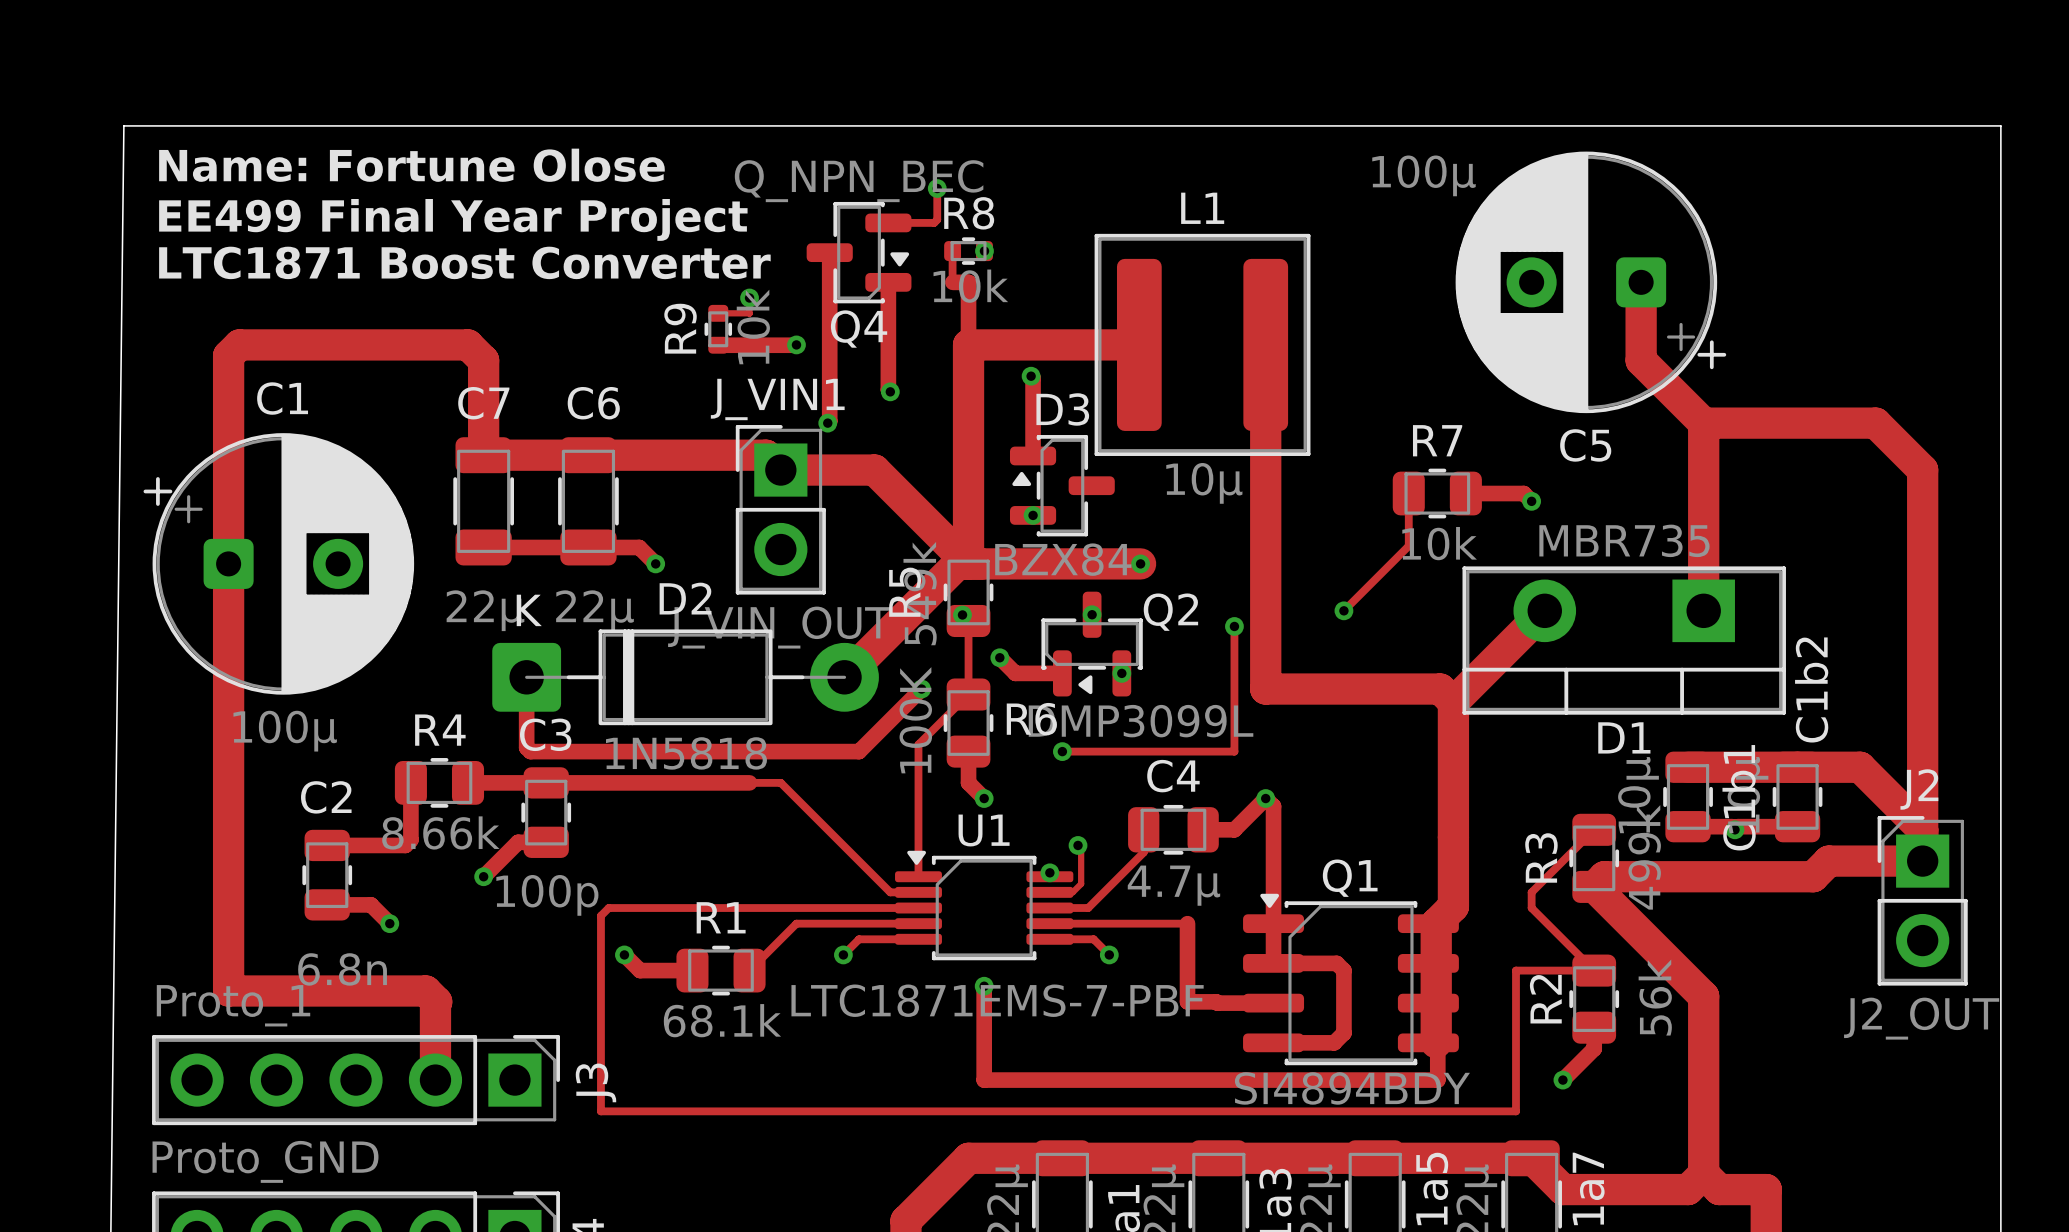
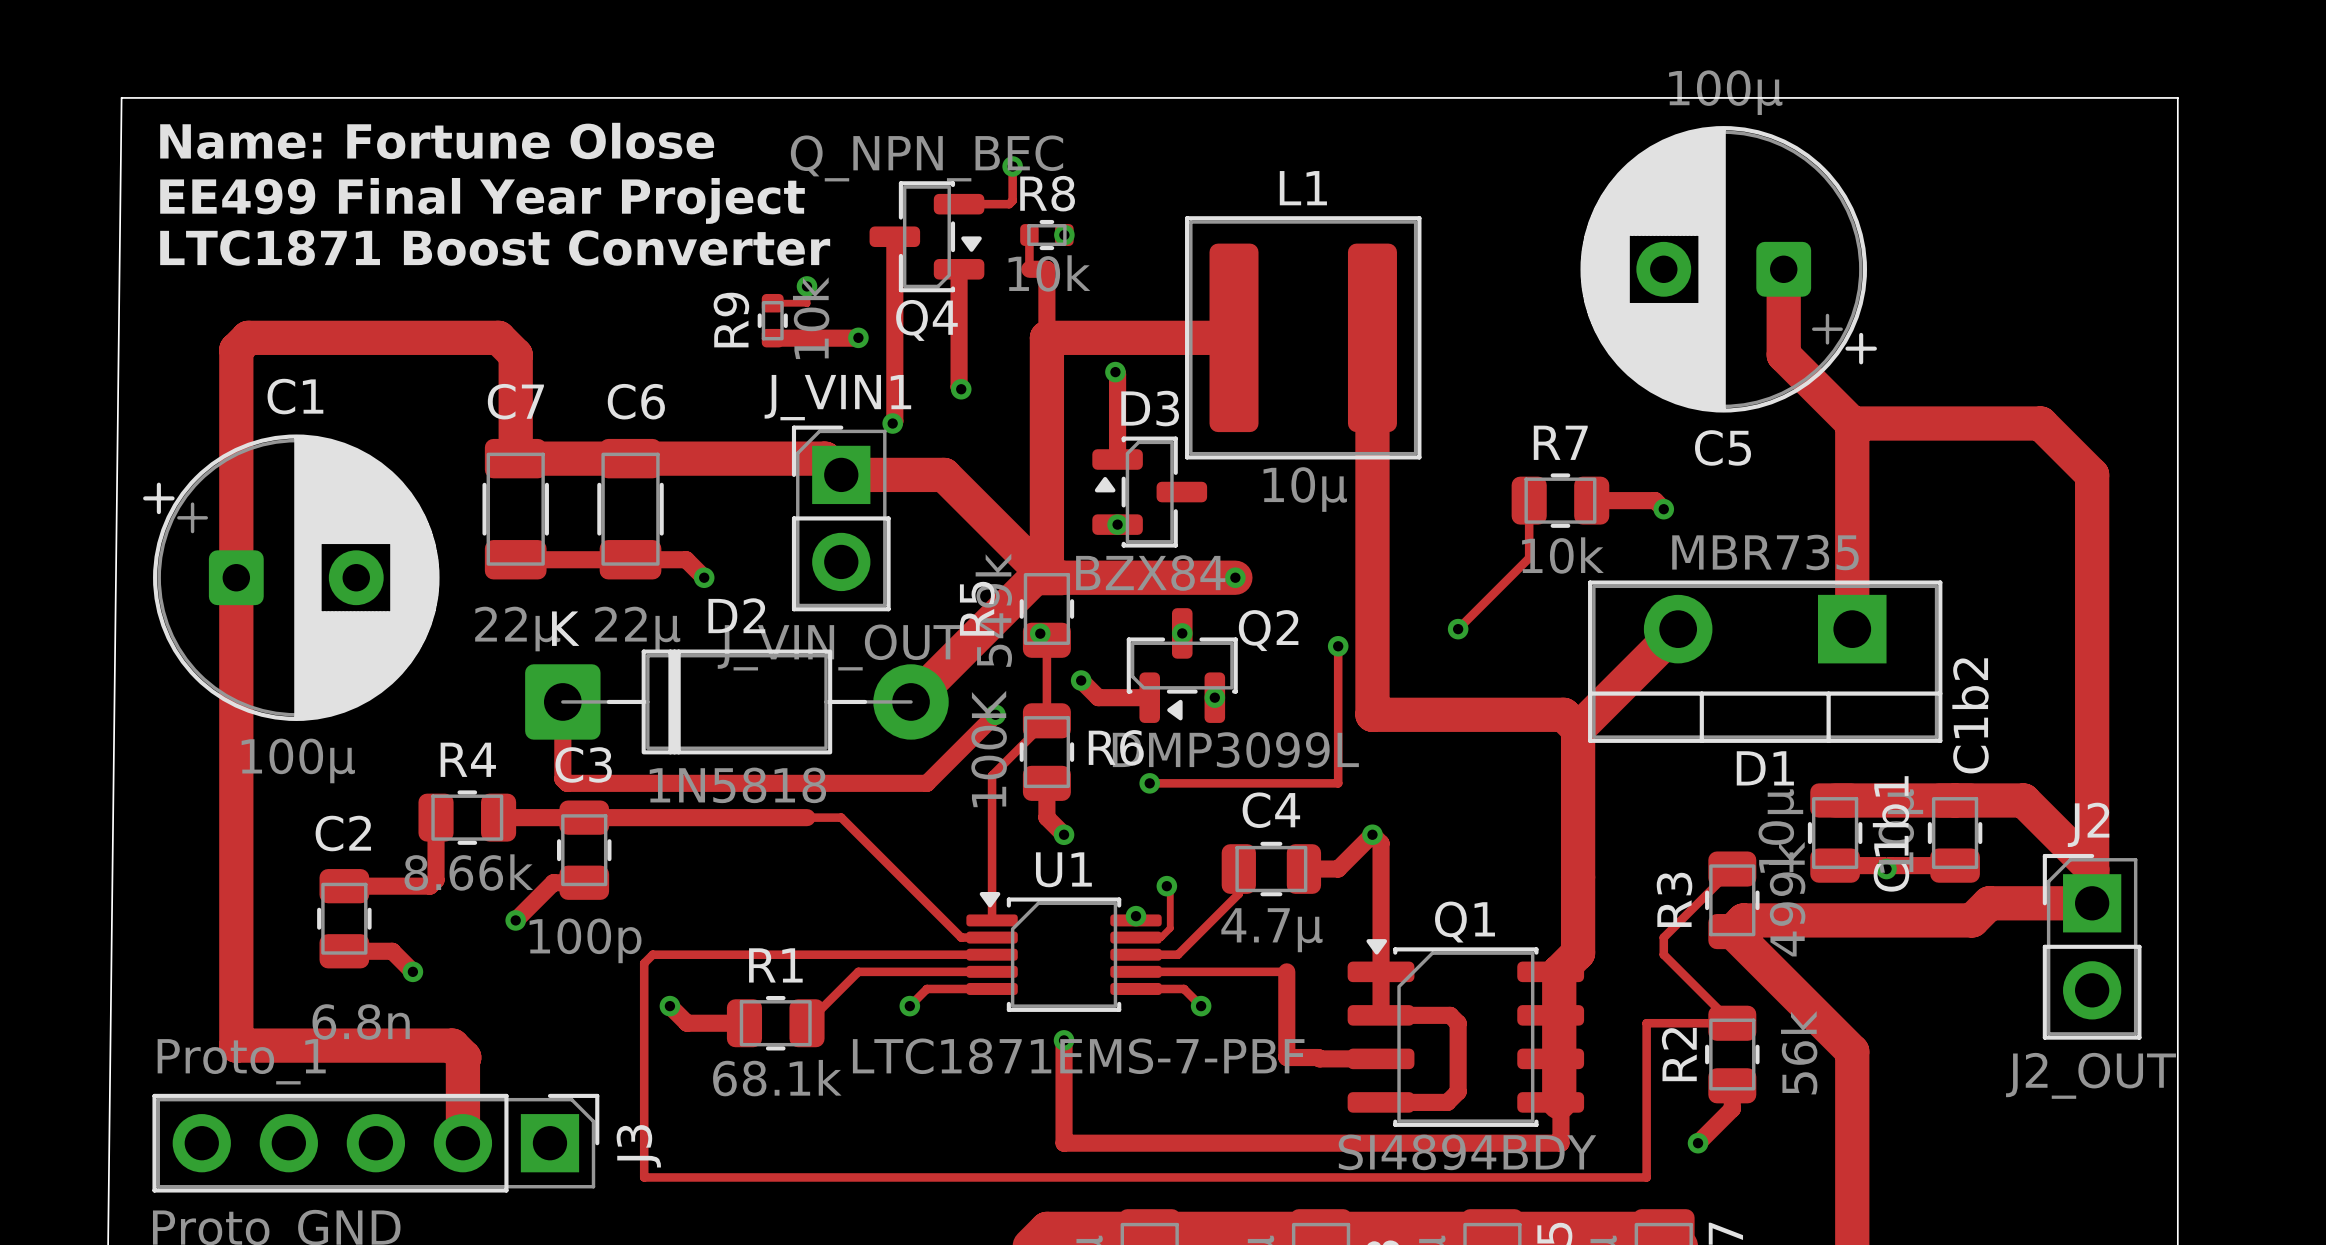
C5 value position: 100µ (1423, 175) -> 100µ (1725, 92)

